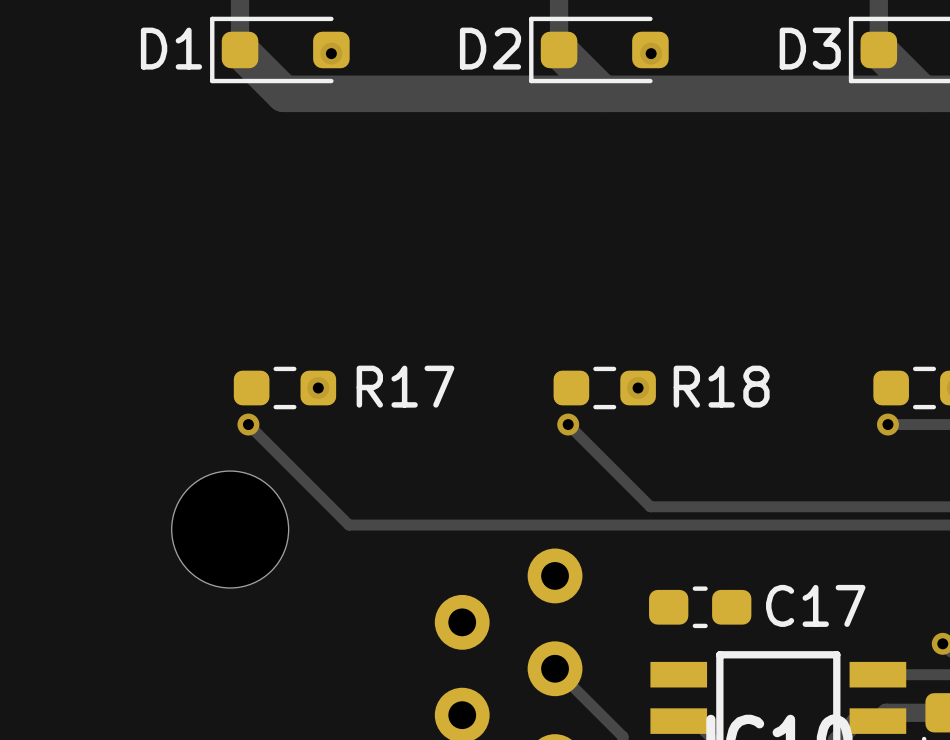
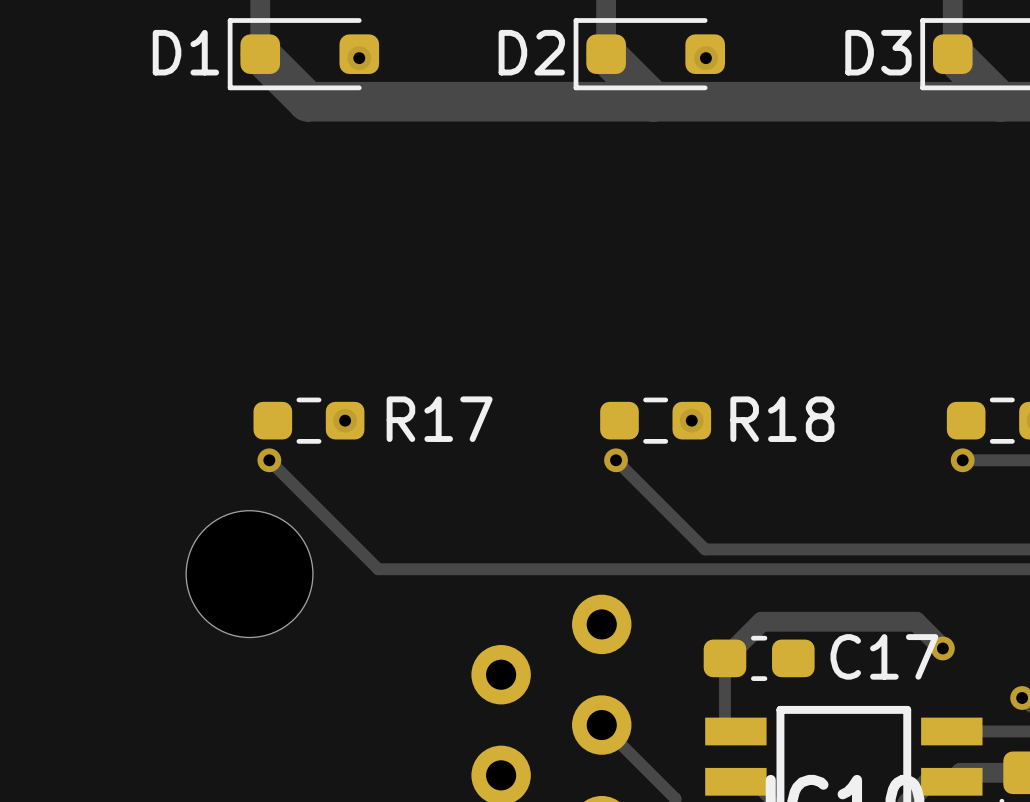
track: none -> (942, 648) (916, 621) (761, 621) (724, 658) (724, 720) (735, 731)
via: none -> (942, 648)

